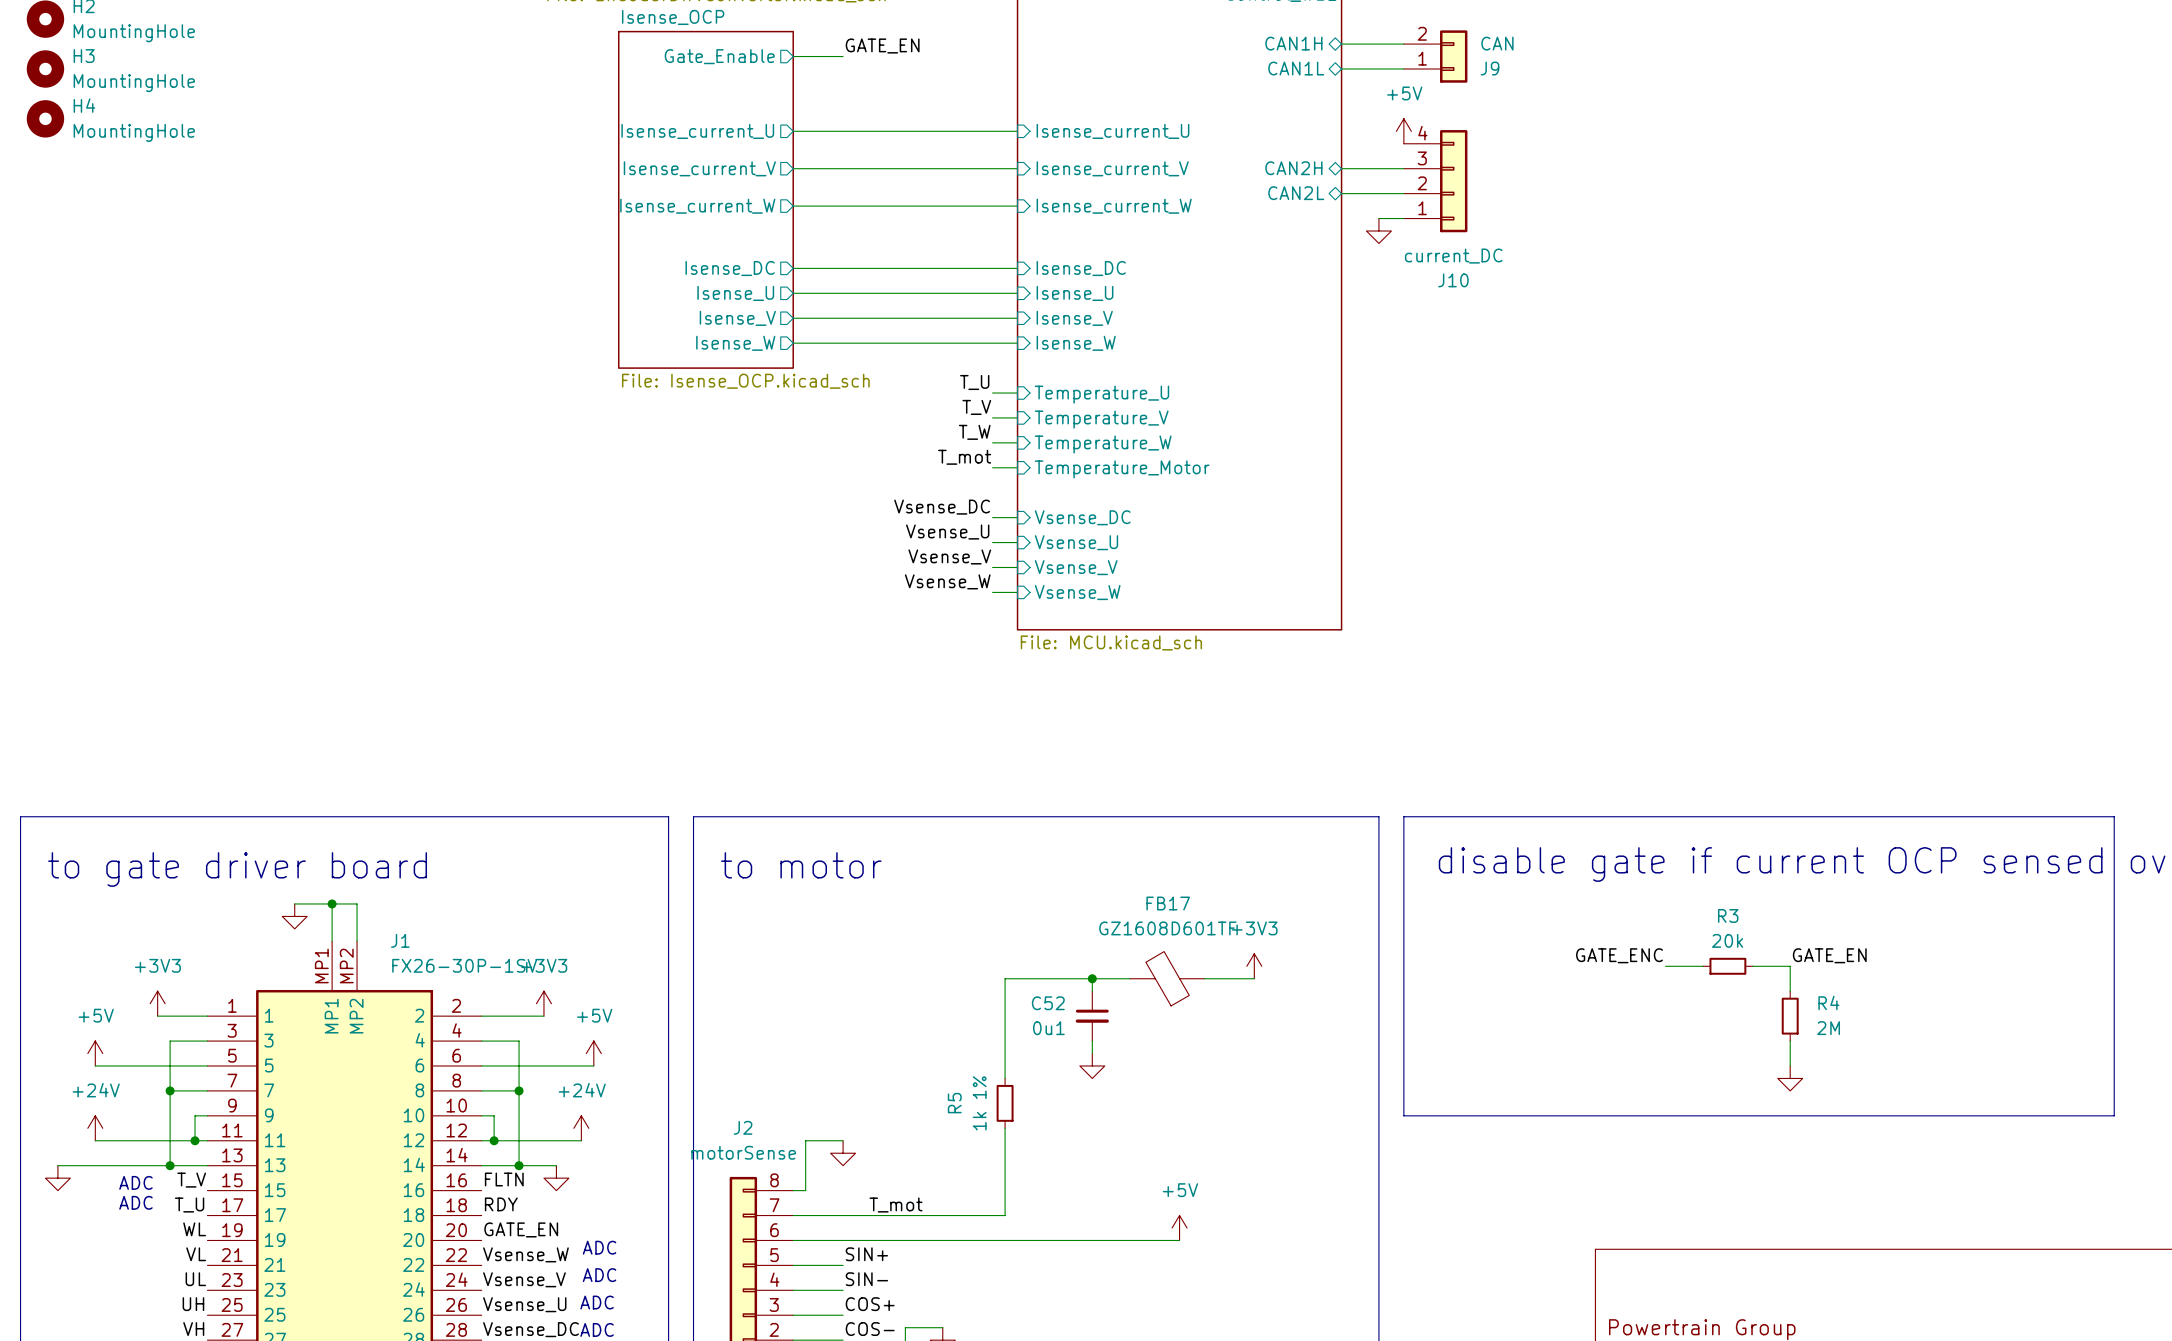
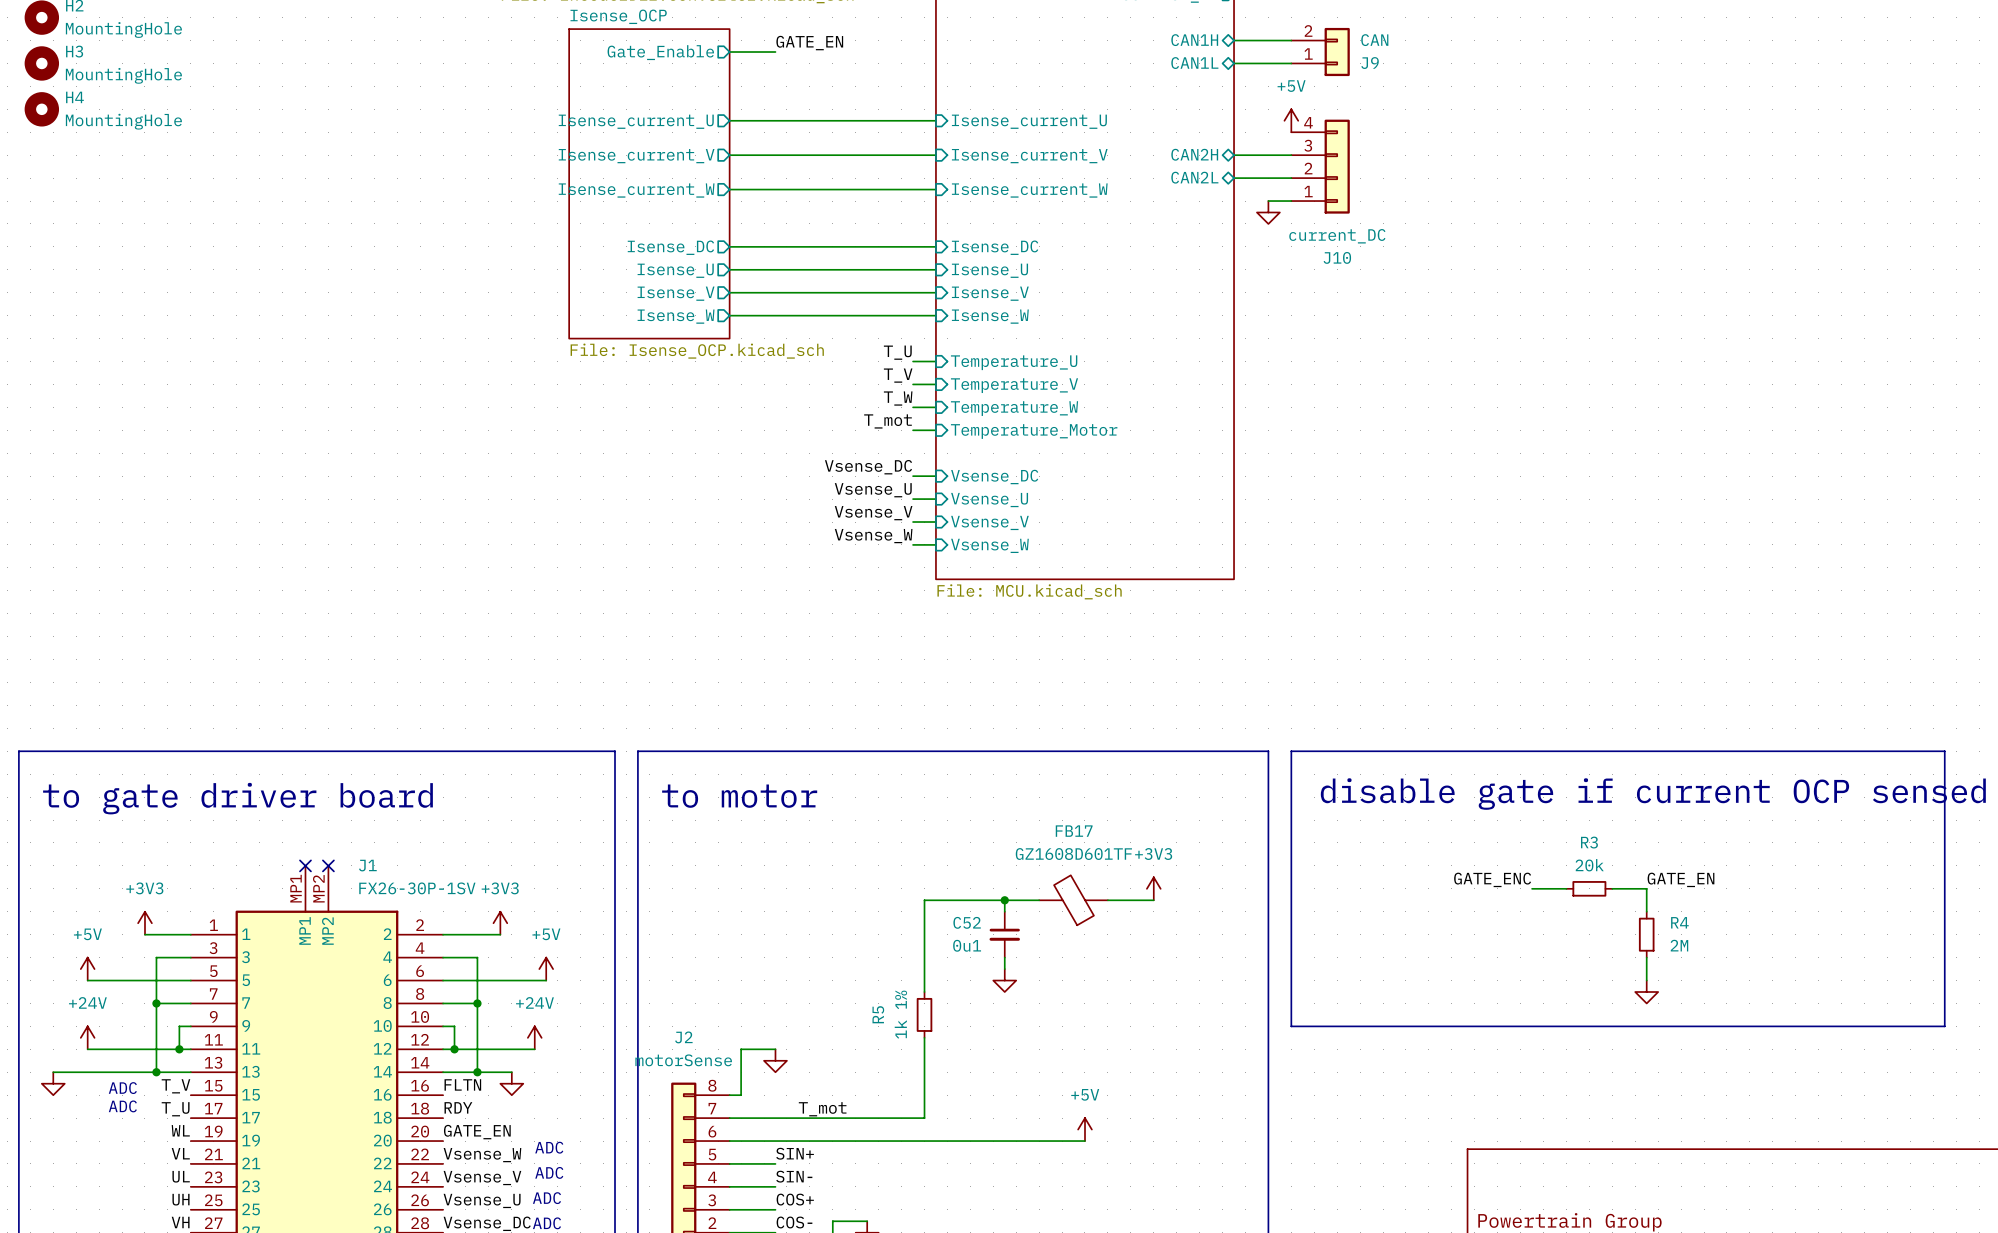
wire: (294, 903) (357, 903) (357, 941) -> none
wire: (332, 903) (332, 941) -> none
junction: (332, 903) -> none
power symbol: (294, 916) -> none
no-connect mark: none -> (305, 865)
no-connect mark: none -> (328, 865)

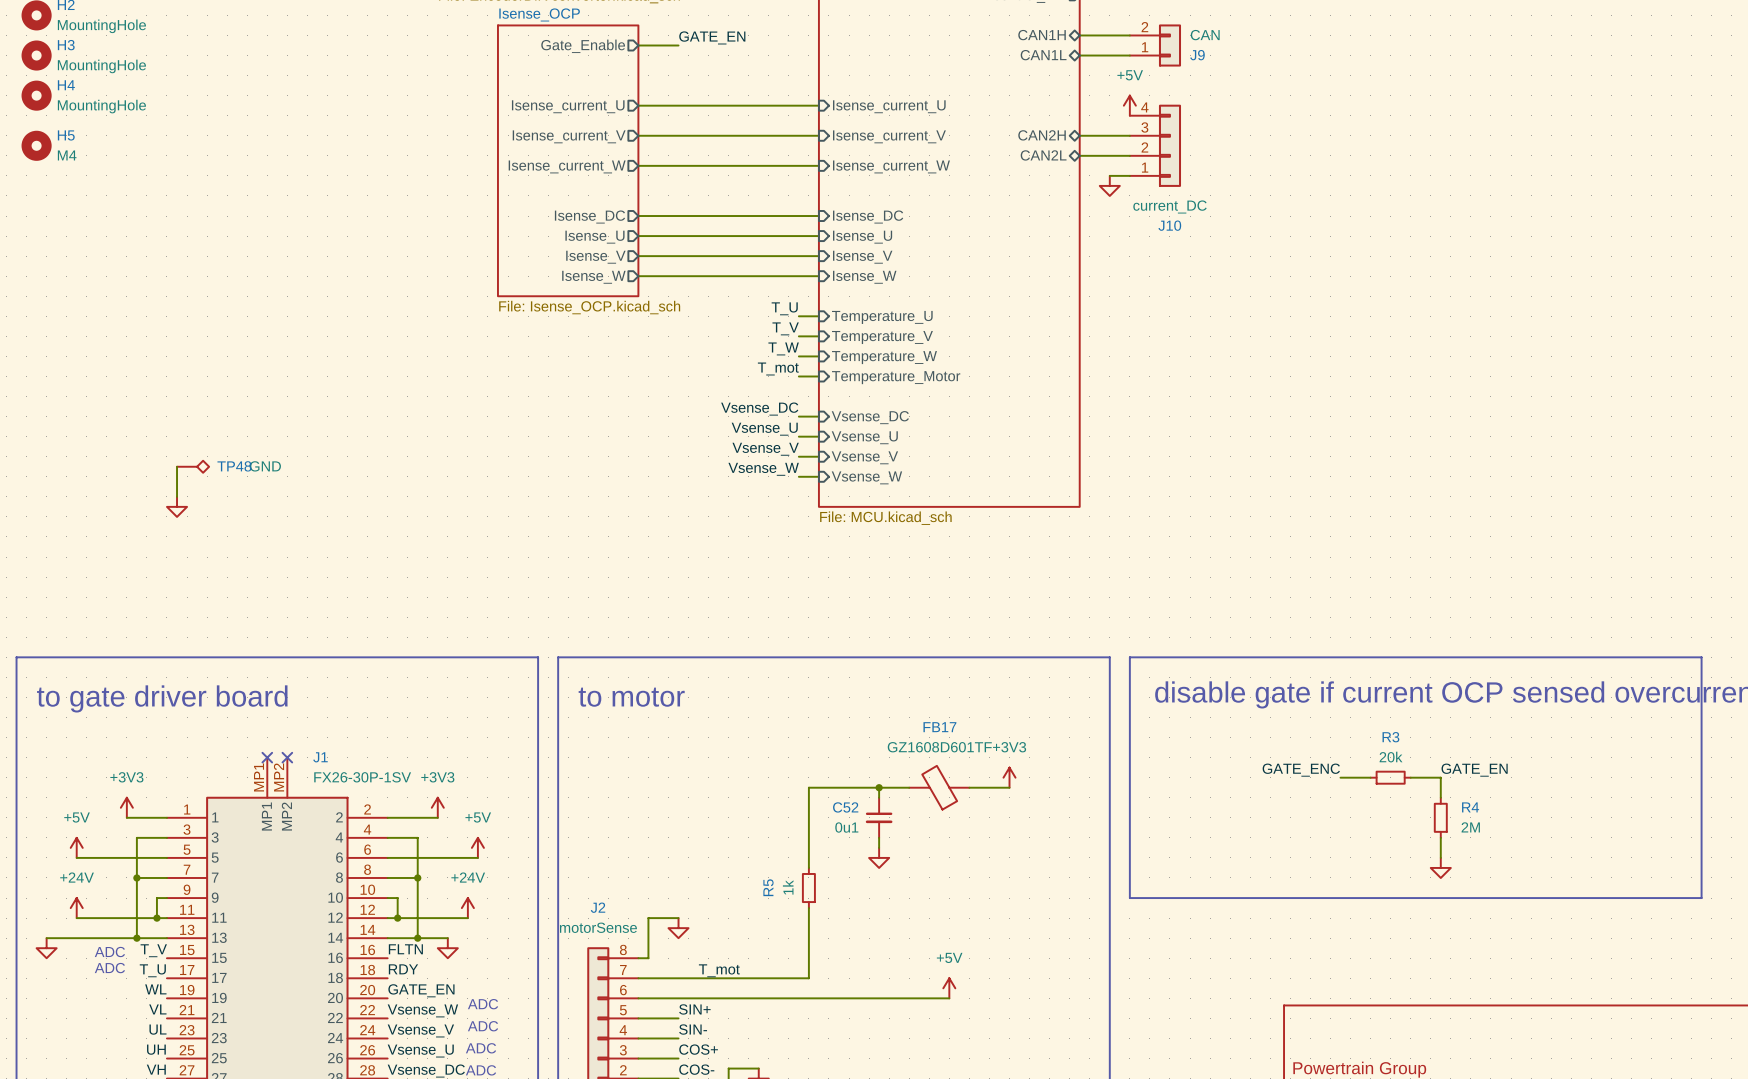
H5: none -> M4 (36, 145)
wire: none -> (177, 466) (177, 496)
TP48: none -> GND (193, 466)
power symbol: none -> (177, 506)
R5 value: 1k 1% (900, 1014) -> 1k (788, 887)

